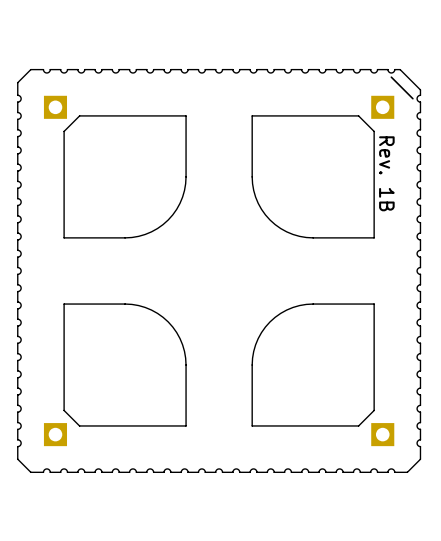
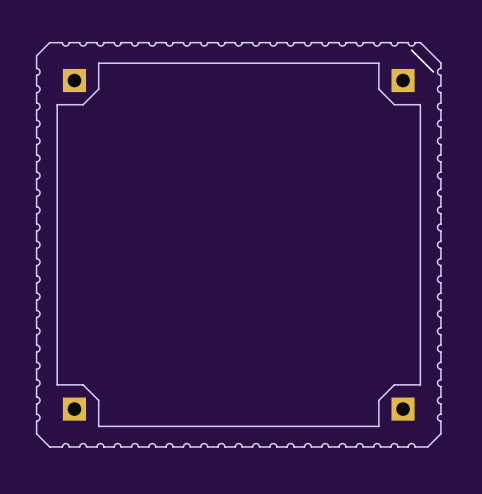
board edge: (79, 115) (186, 115) (184, 190) (180, 203) (168, 220) (151, 231) (138, 236) (64, 237) (64, 131) -> (83, 384) (57, 384) (57, 104) (83, 104)
board edge: none -> (98, 89) (98, 63) (378, 63) (378, 89) (394, 104) (420, 104) (420, 384) (394, 384)
board edge: (358, 115) (252, 115) (253, 190) (261, 209) (275, 224) (286, 231) (306, 237) (374, 237) (374, 131) (358, 115) -> none
text: Rev. 1B (386, 173) -> none
board edge: (64, 410) (64, 304) (138, 305) (157, 313) (168, 321) (176, 332) (184, 351) (186, 425) (79, 425) -> none
board edge: (374, 410) (374, 304) (299, 305) (286, 310) (270, 321) (258, 338) (253, 351) (252, 425) (358, 425) -> (98, 400) (98, 426) (378, 426) (378, 400)

